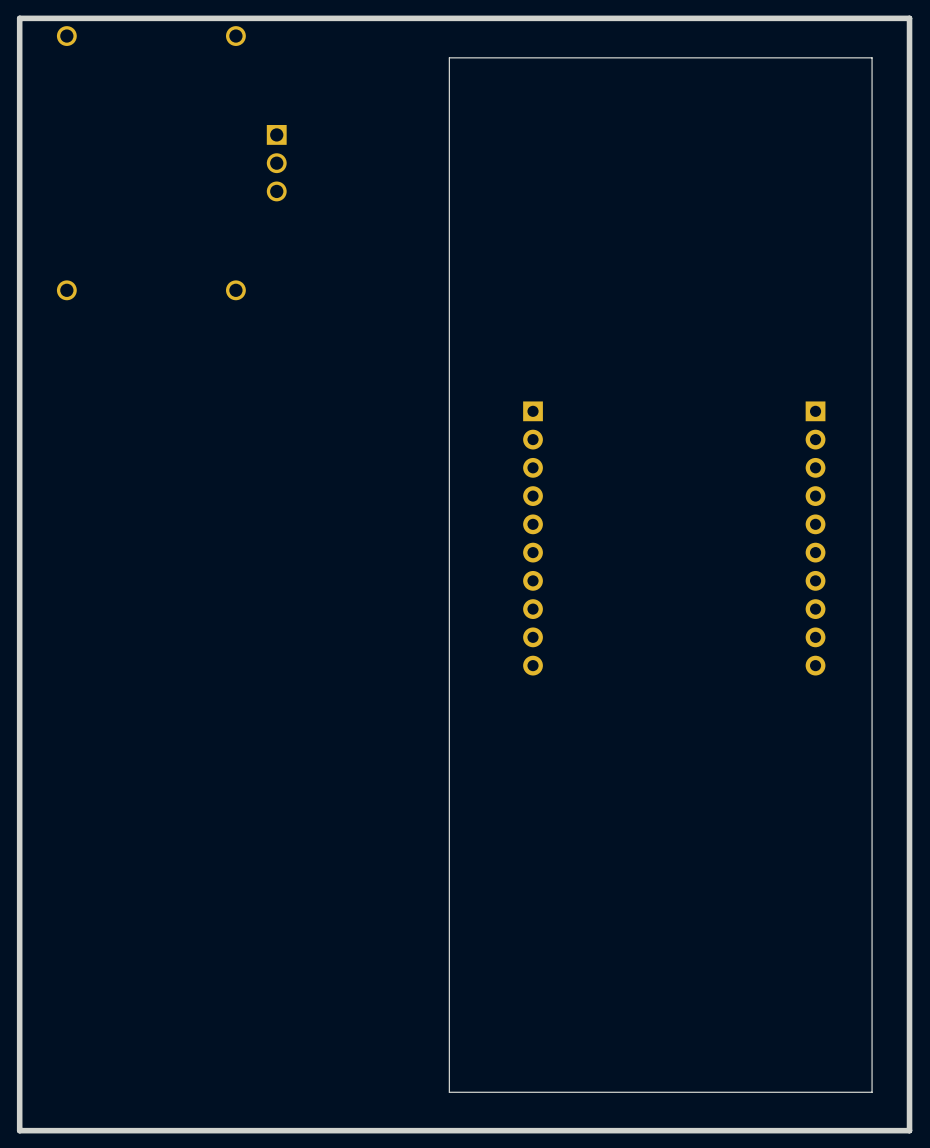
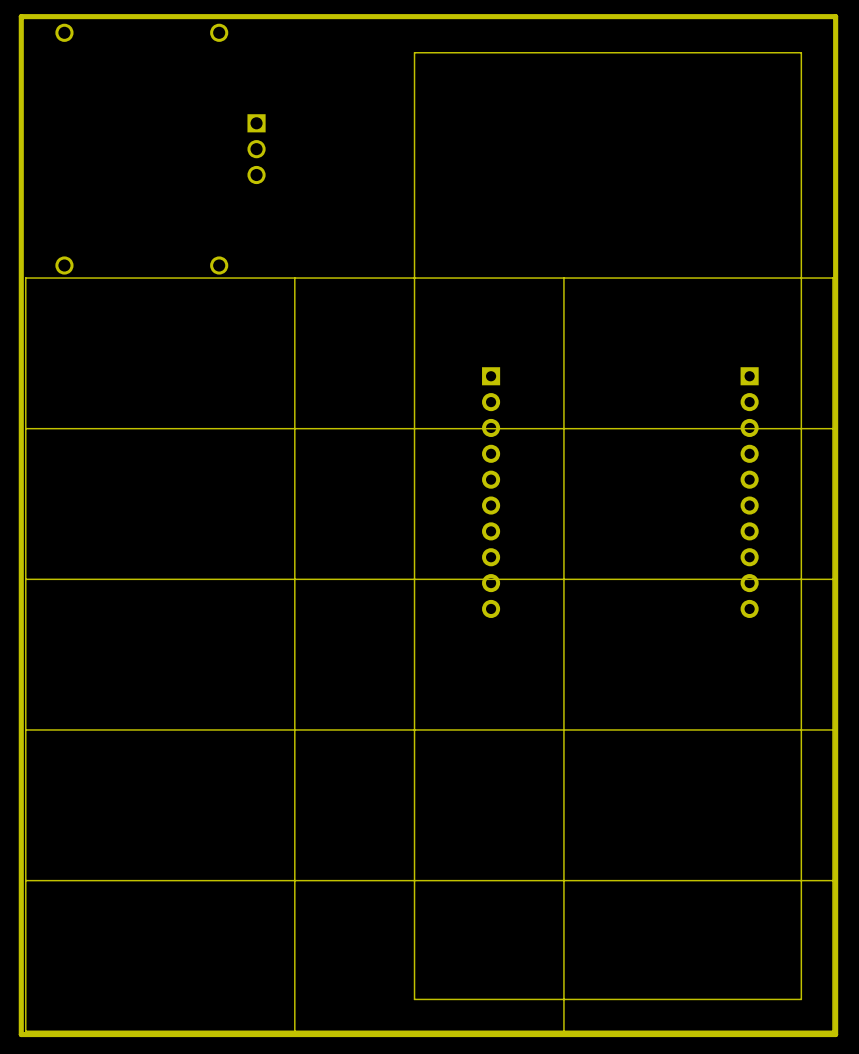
board edge: none -> (294, 278) (294, 1031)
board edge: none -> (563, 278) (563, 1031)
board edge: none -> (832, 278) (25, 278) (25, 1031) (832, 1031) (832, 278)
board edge: none -> (832, 428) (25, 428)
board edge: none -> (832, 579) (25, 579)
board edge: none -> (832, 729) (25, 729)
board edge: none -> (832, 880) (25, 880)

